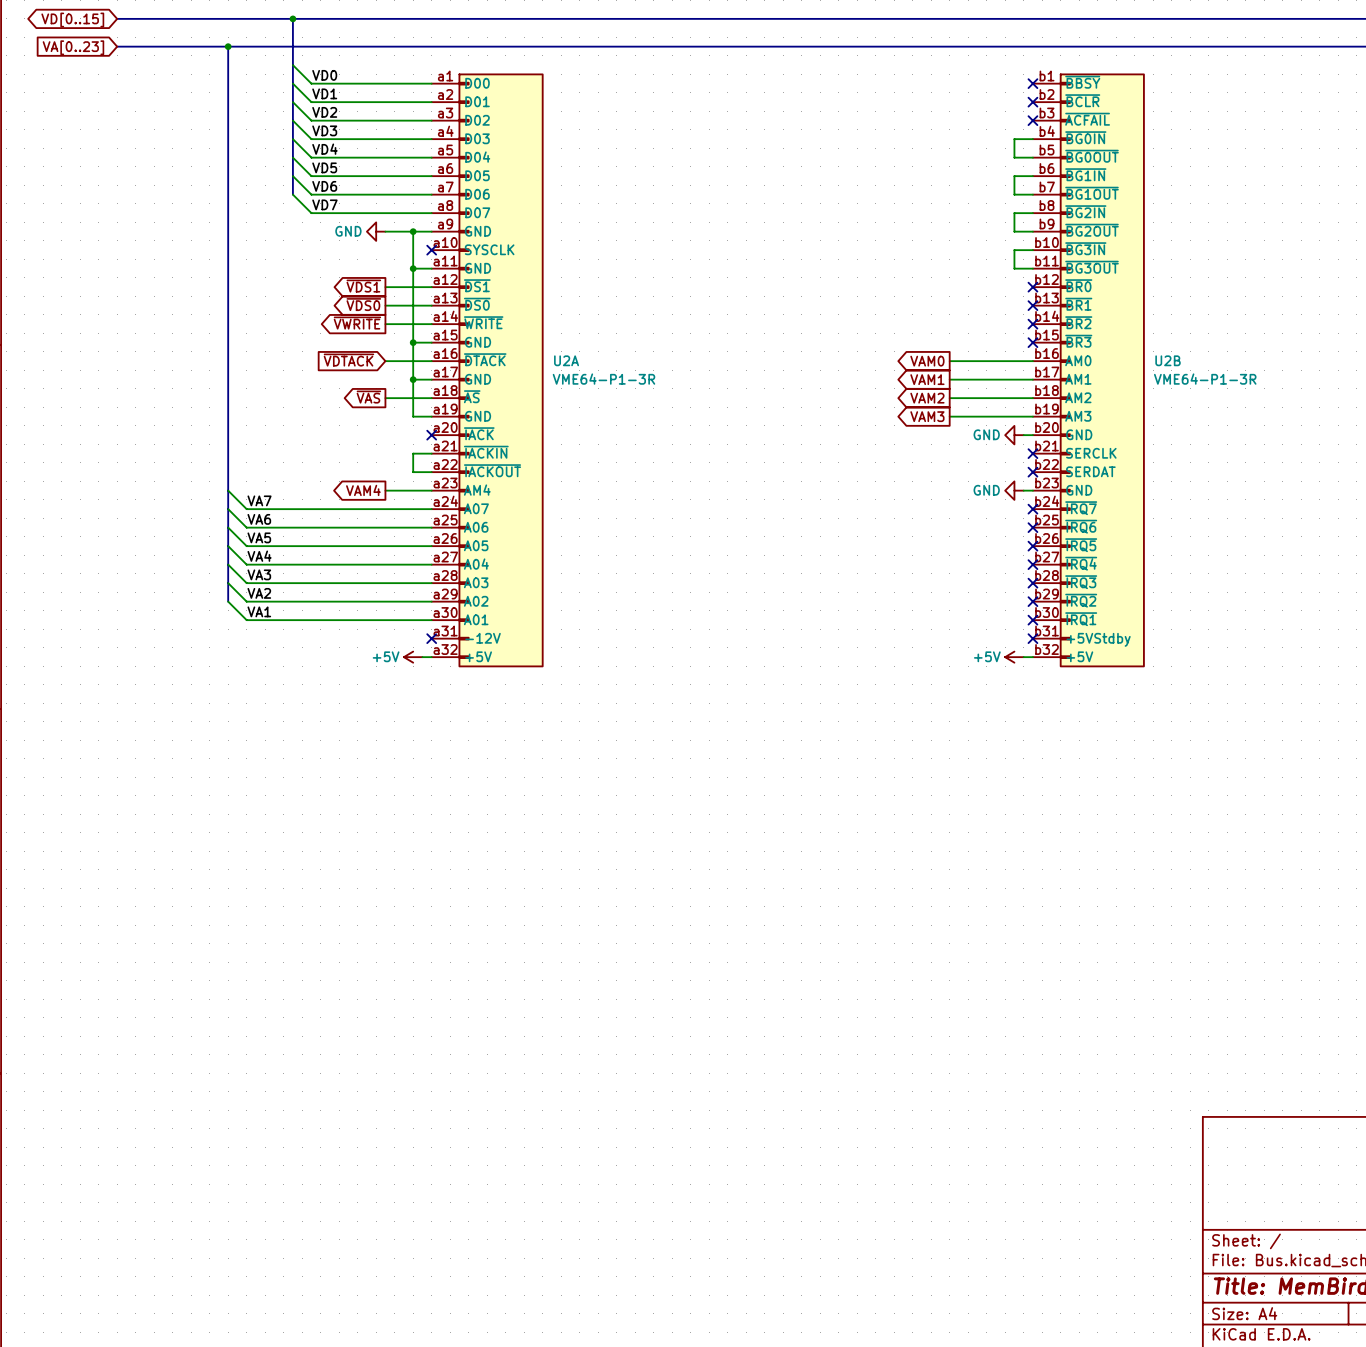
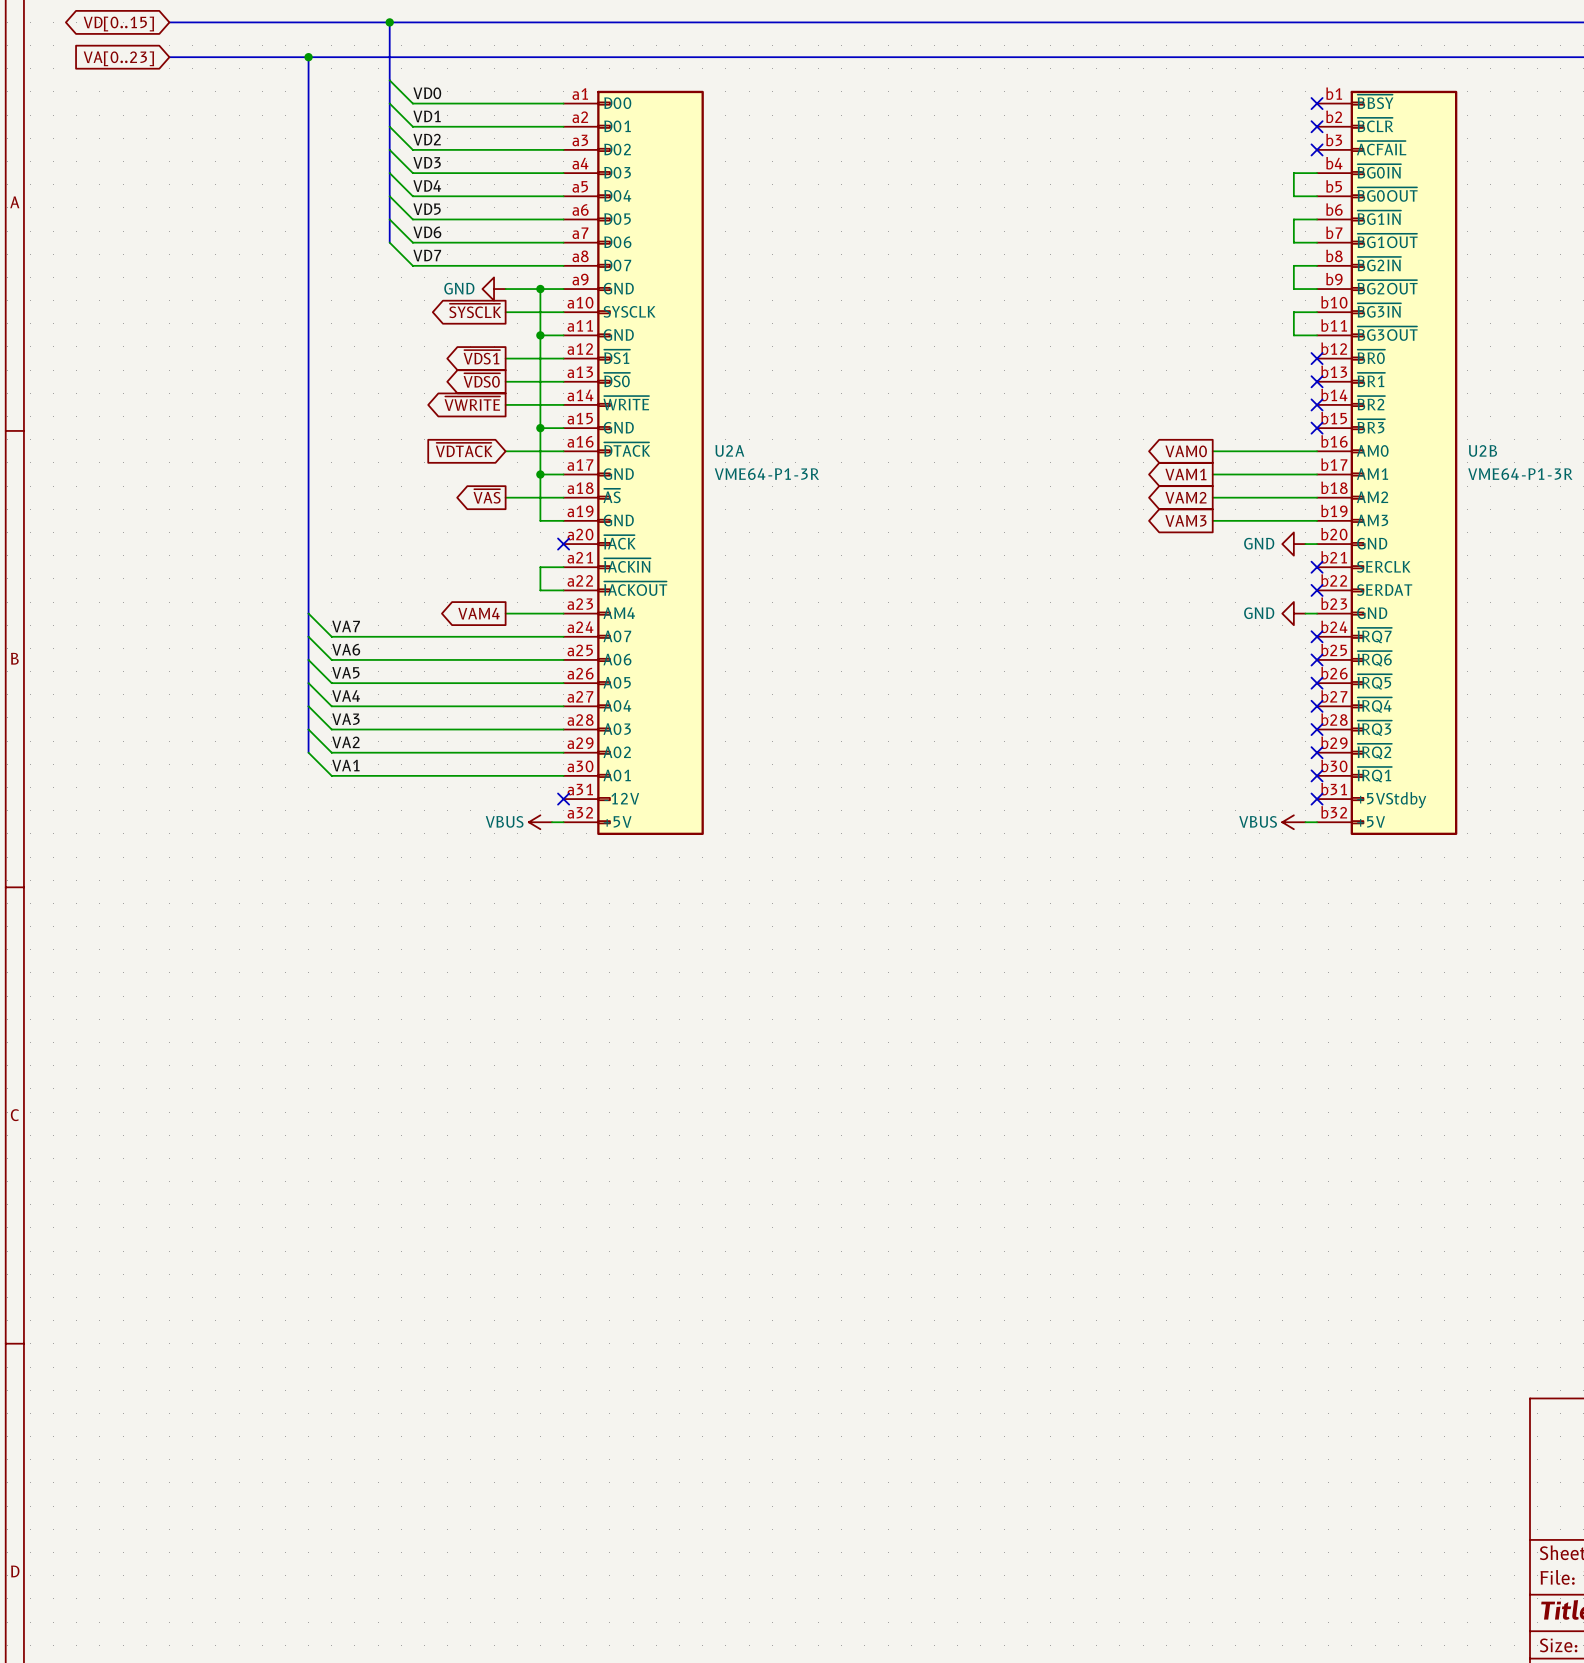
global label: none -> ~{SYSCLK} (475, 310)
wire: none -> (505, 312) (563, 312)
no-connect mark: (431, 250) -> none
power symbol: +5V (413, 657) -> VBUS (540, 822)
power symbol: +5V (1014, 657) -> VBUS (1293, 822)

